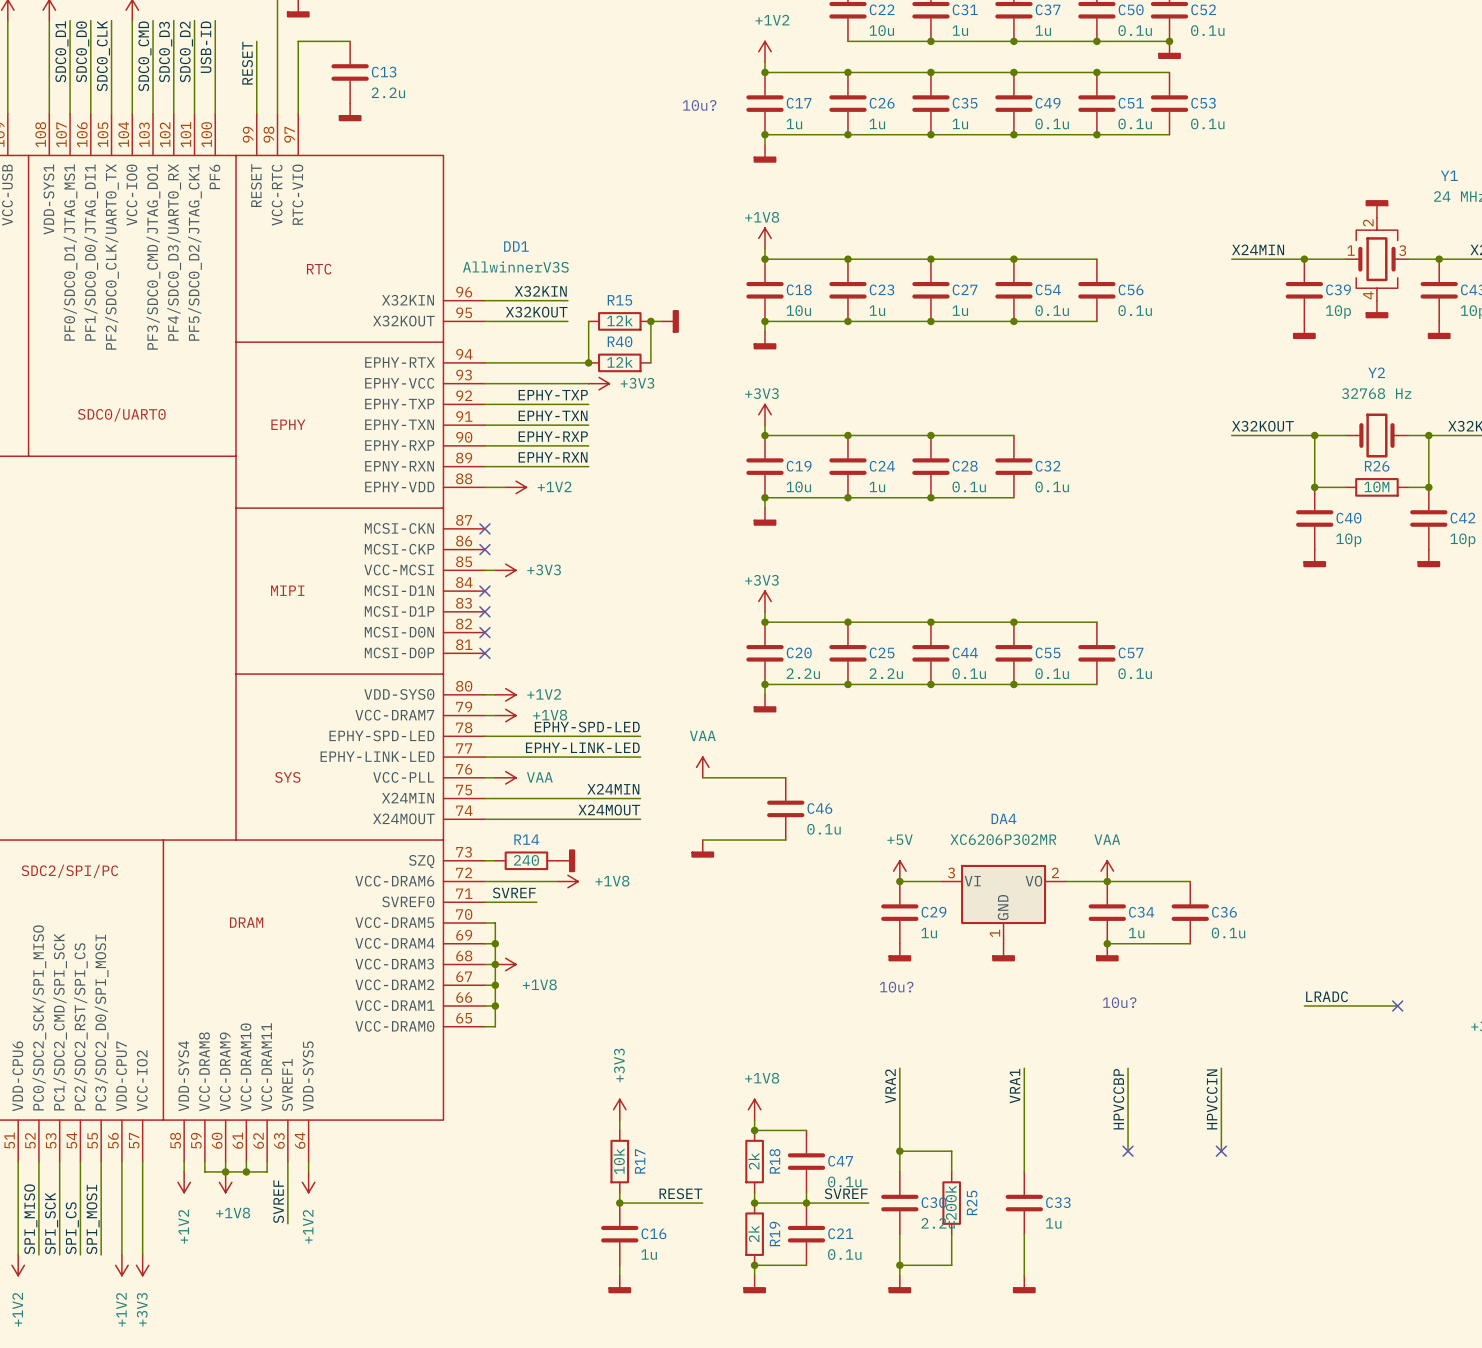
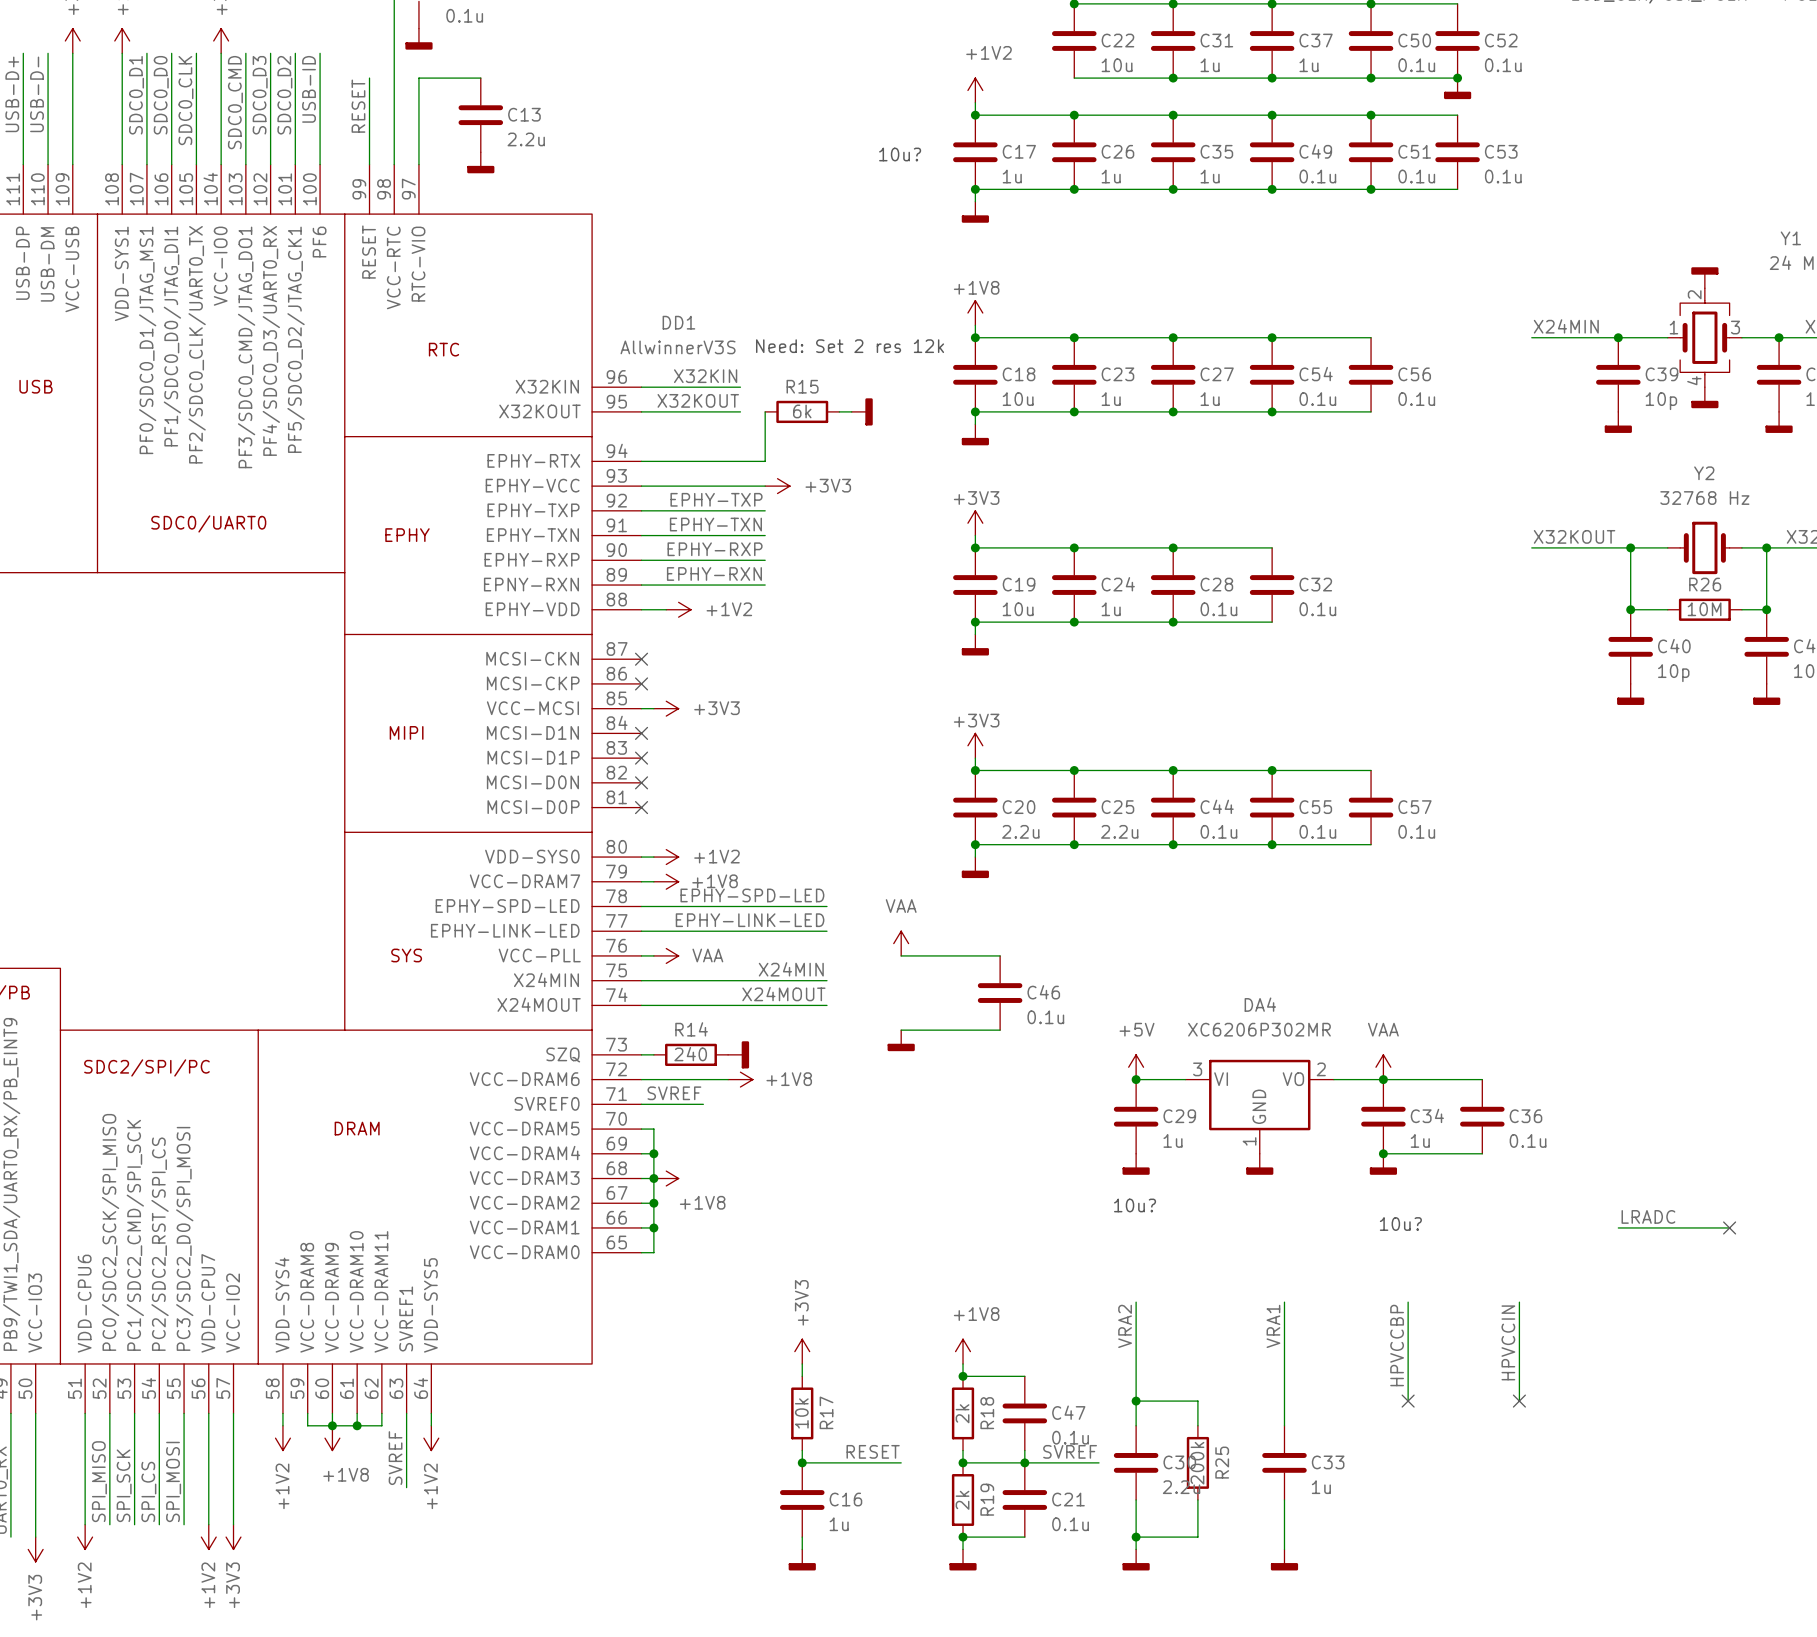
text: none -> Need: Set 2 res 12k (850, 346)
R15 value: 12k (619, 320) -> 6k (802, 411)
wire: (650, 321) (650, 362) -> none
junction: (650, 321) -> none
junction: (588, 362) -> none
R40: 12k (619, 362) -> none

